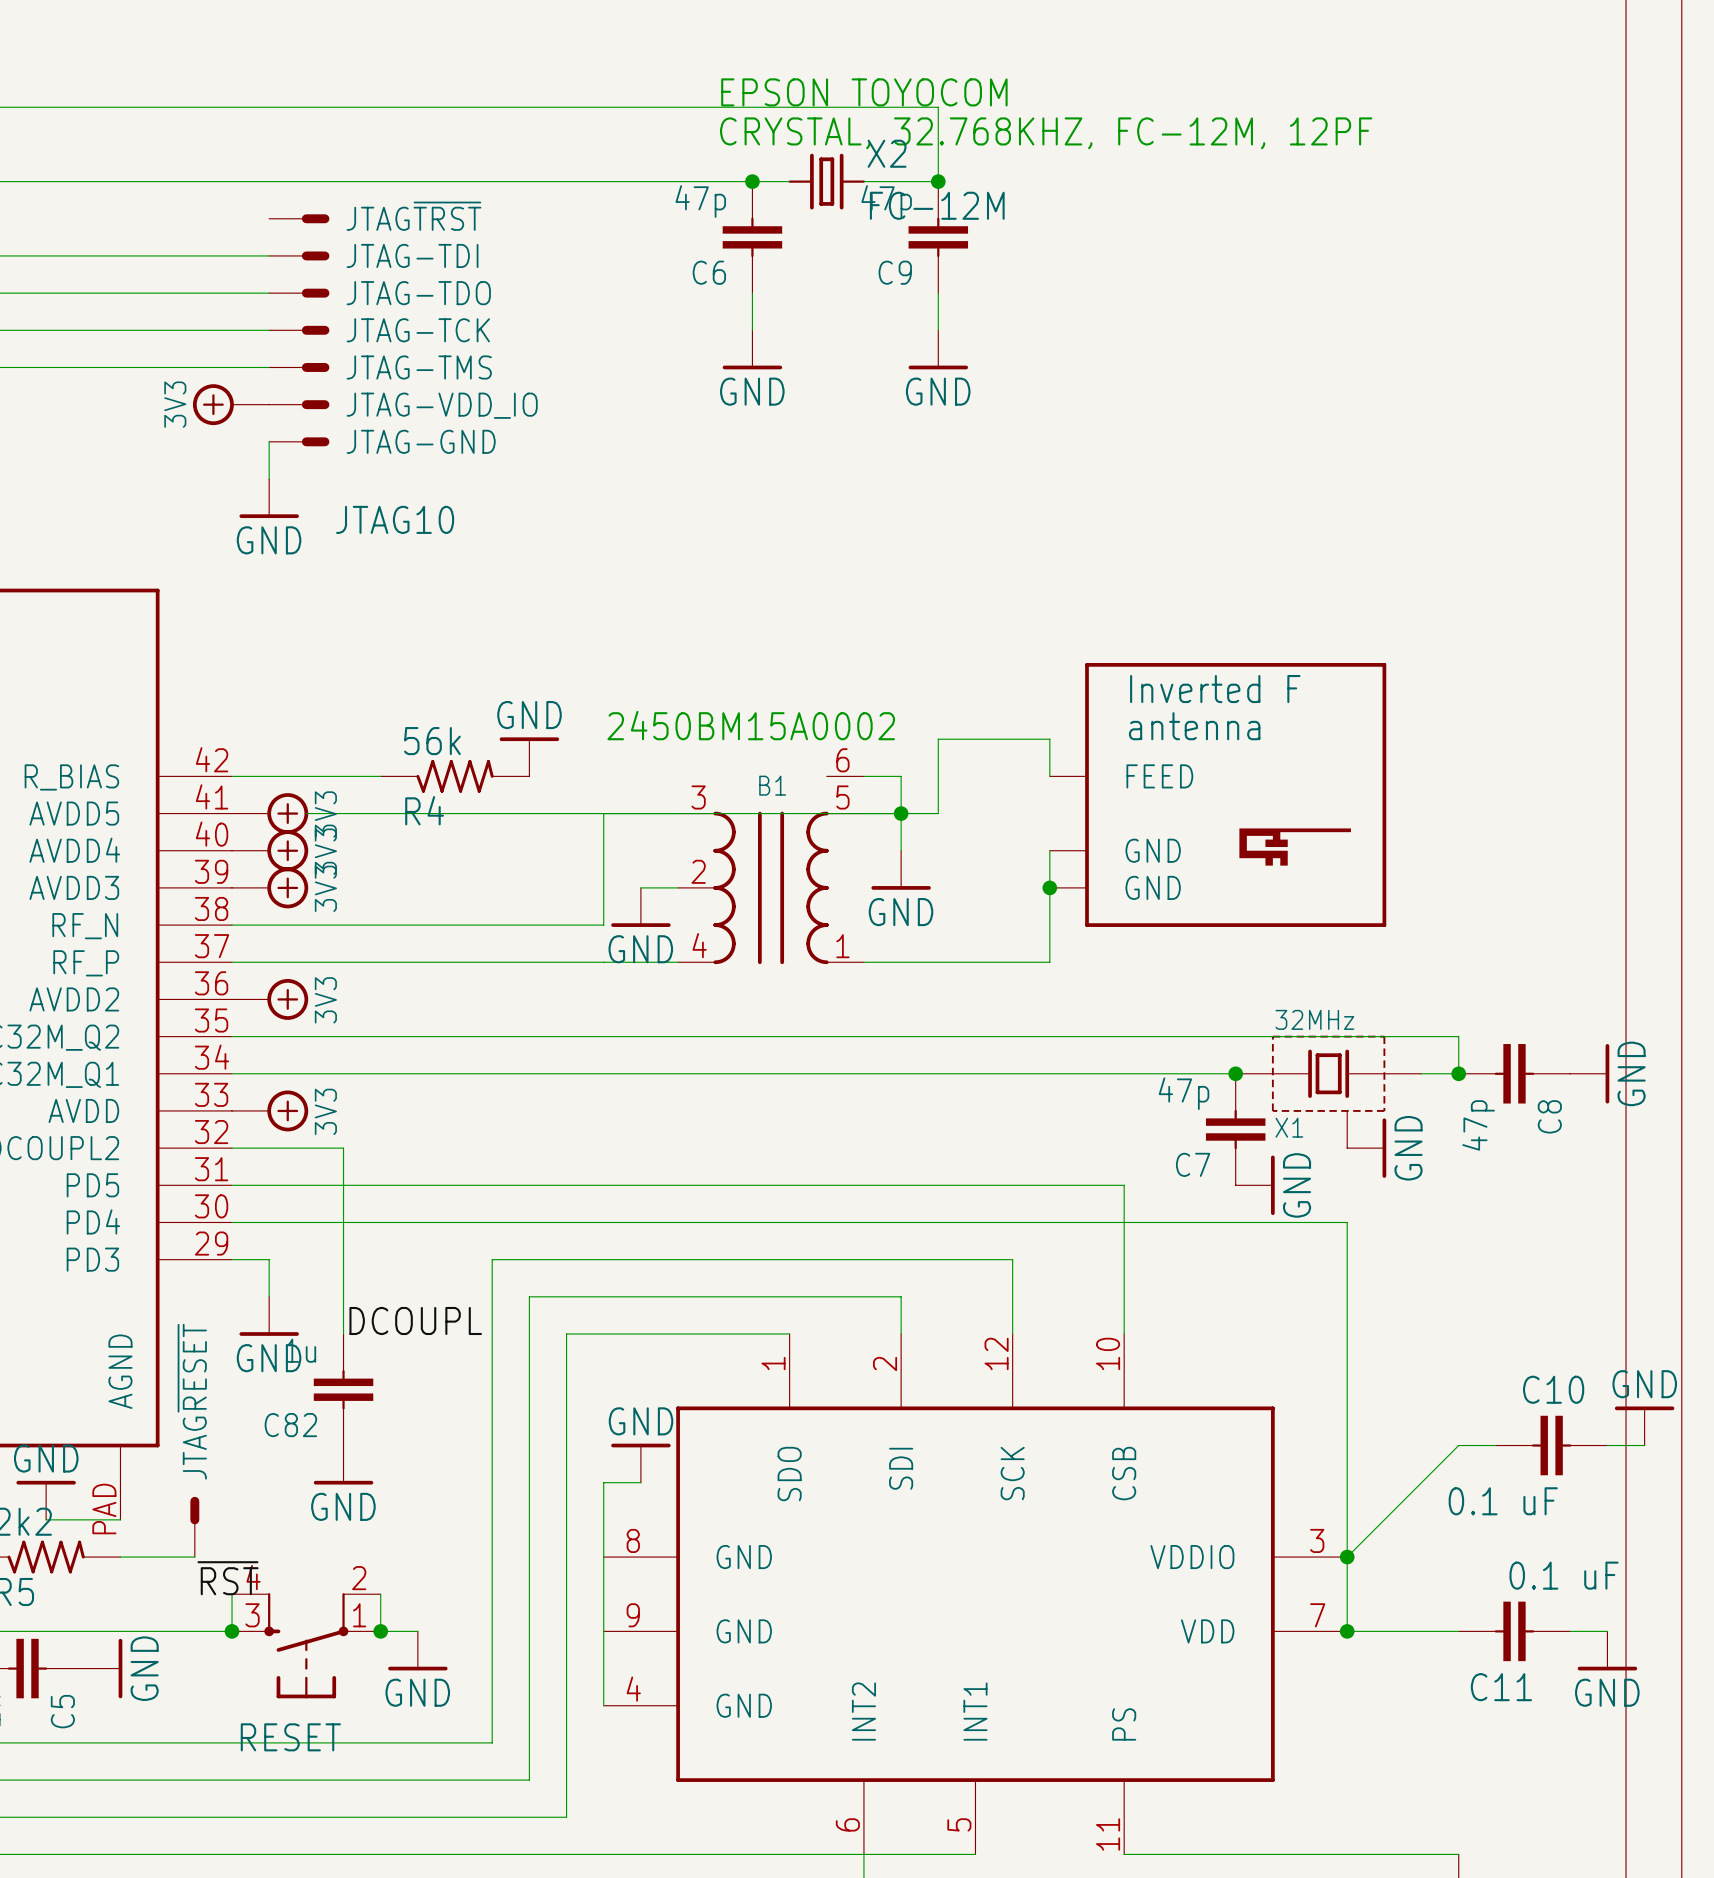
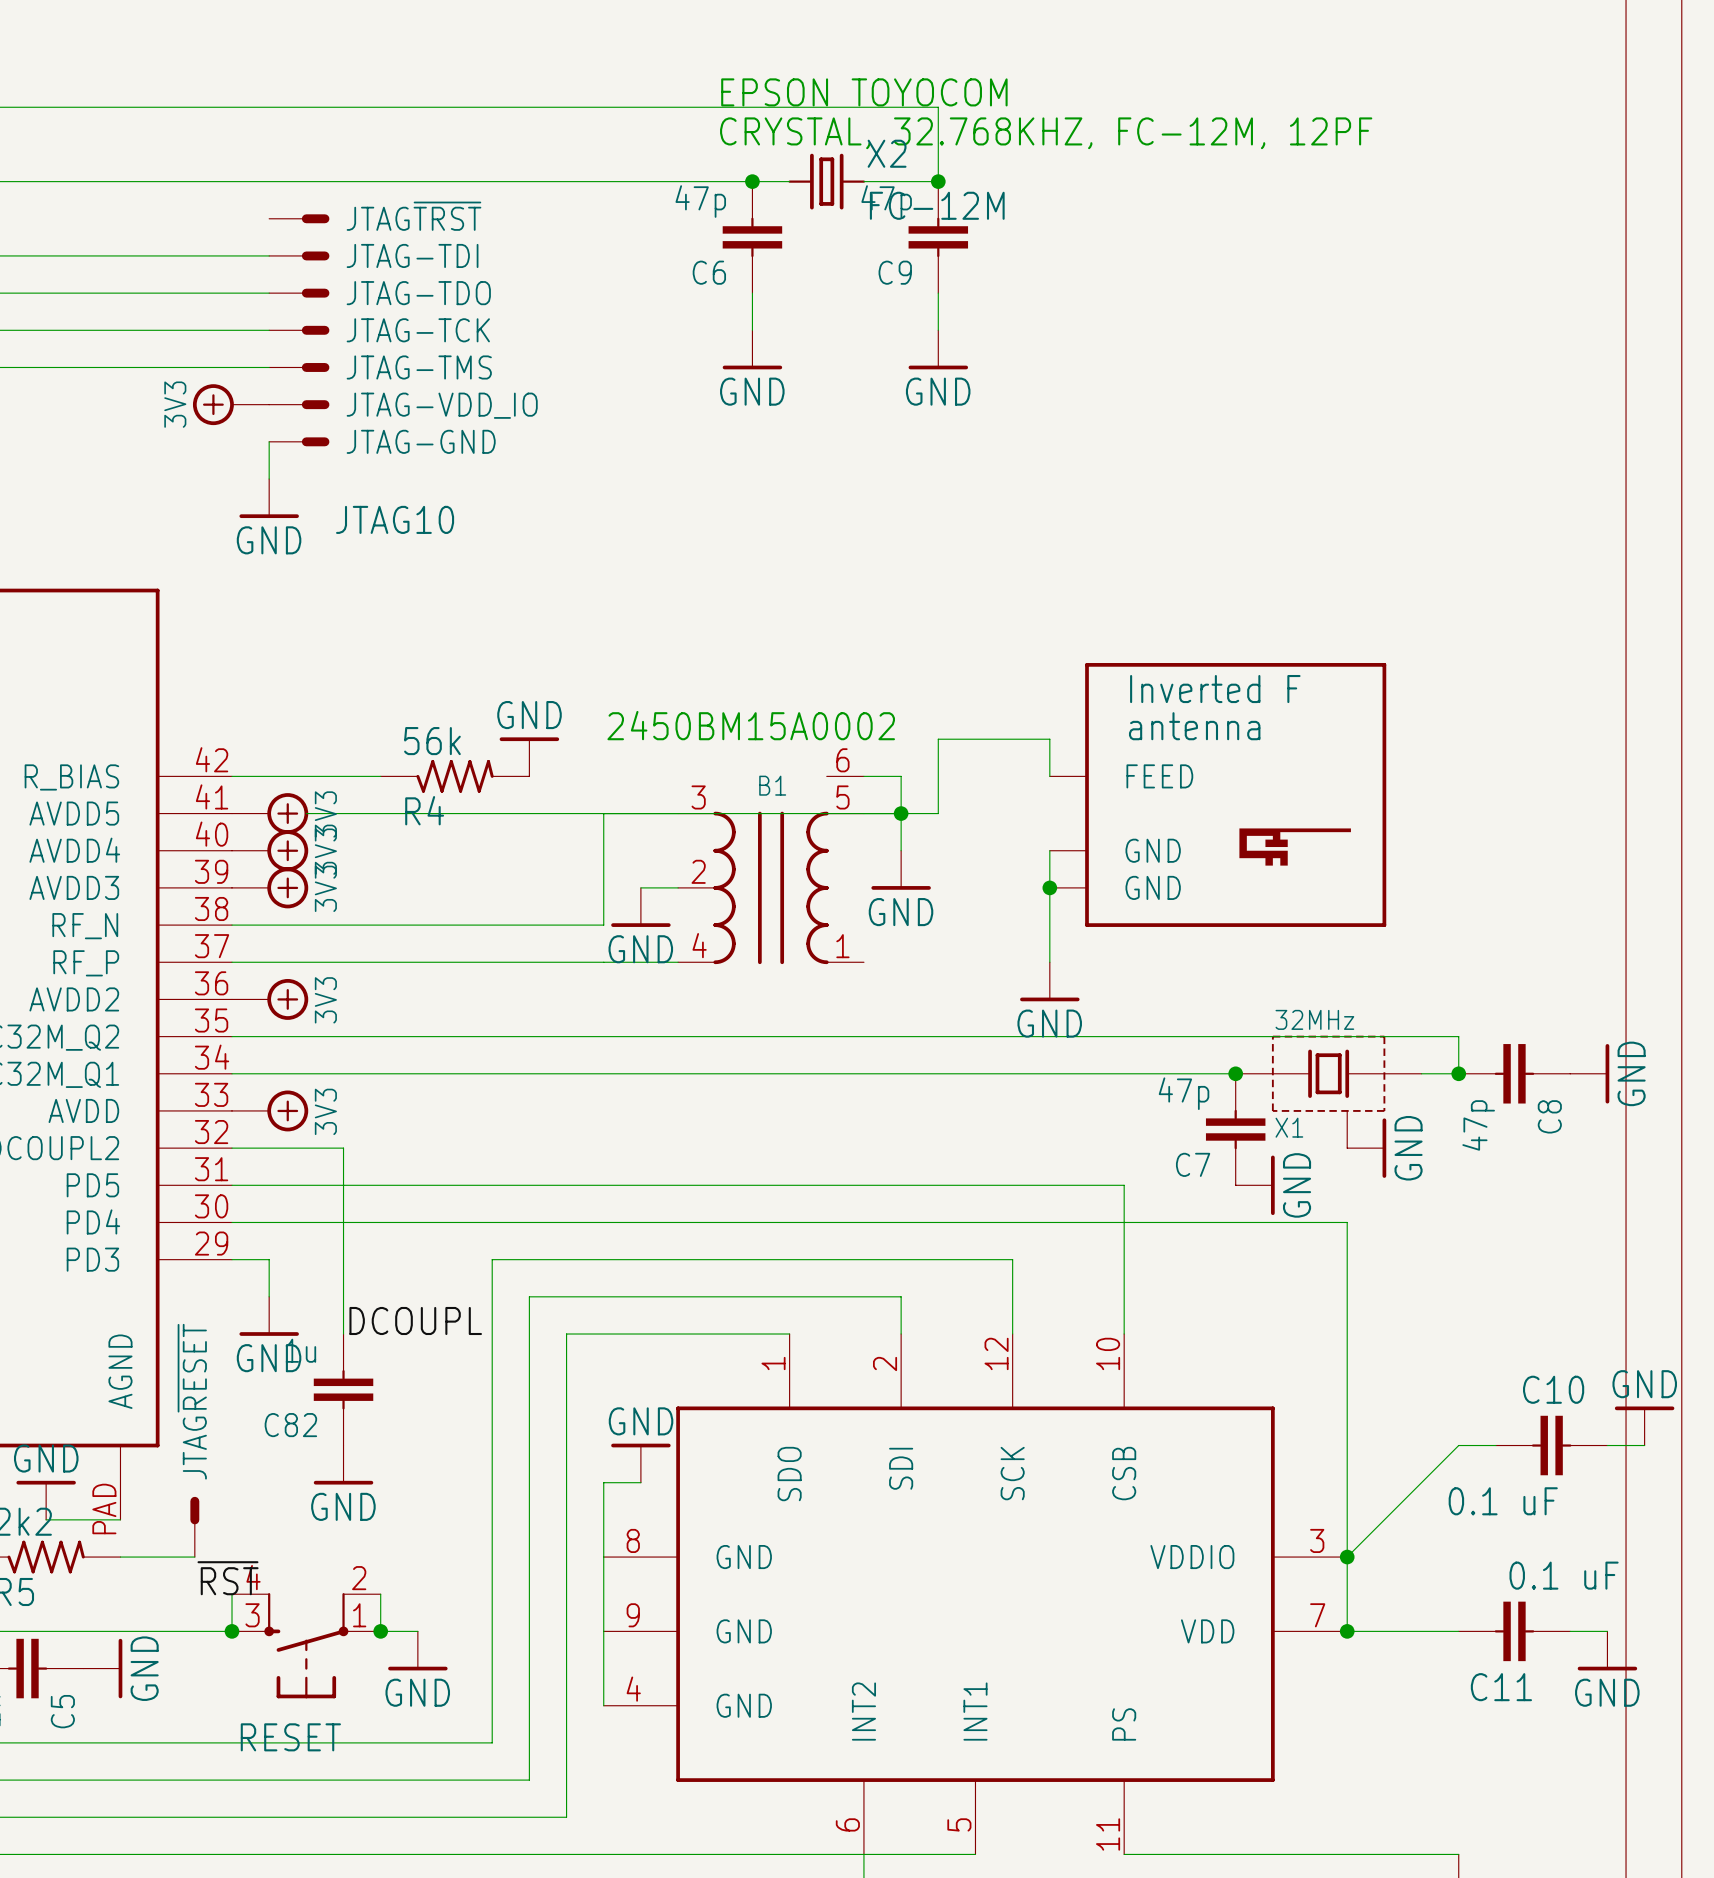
wire: (863, 962) (1049, 962) -> none
power symbol: none -> GND (1049, 981)

